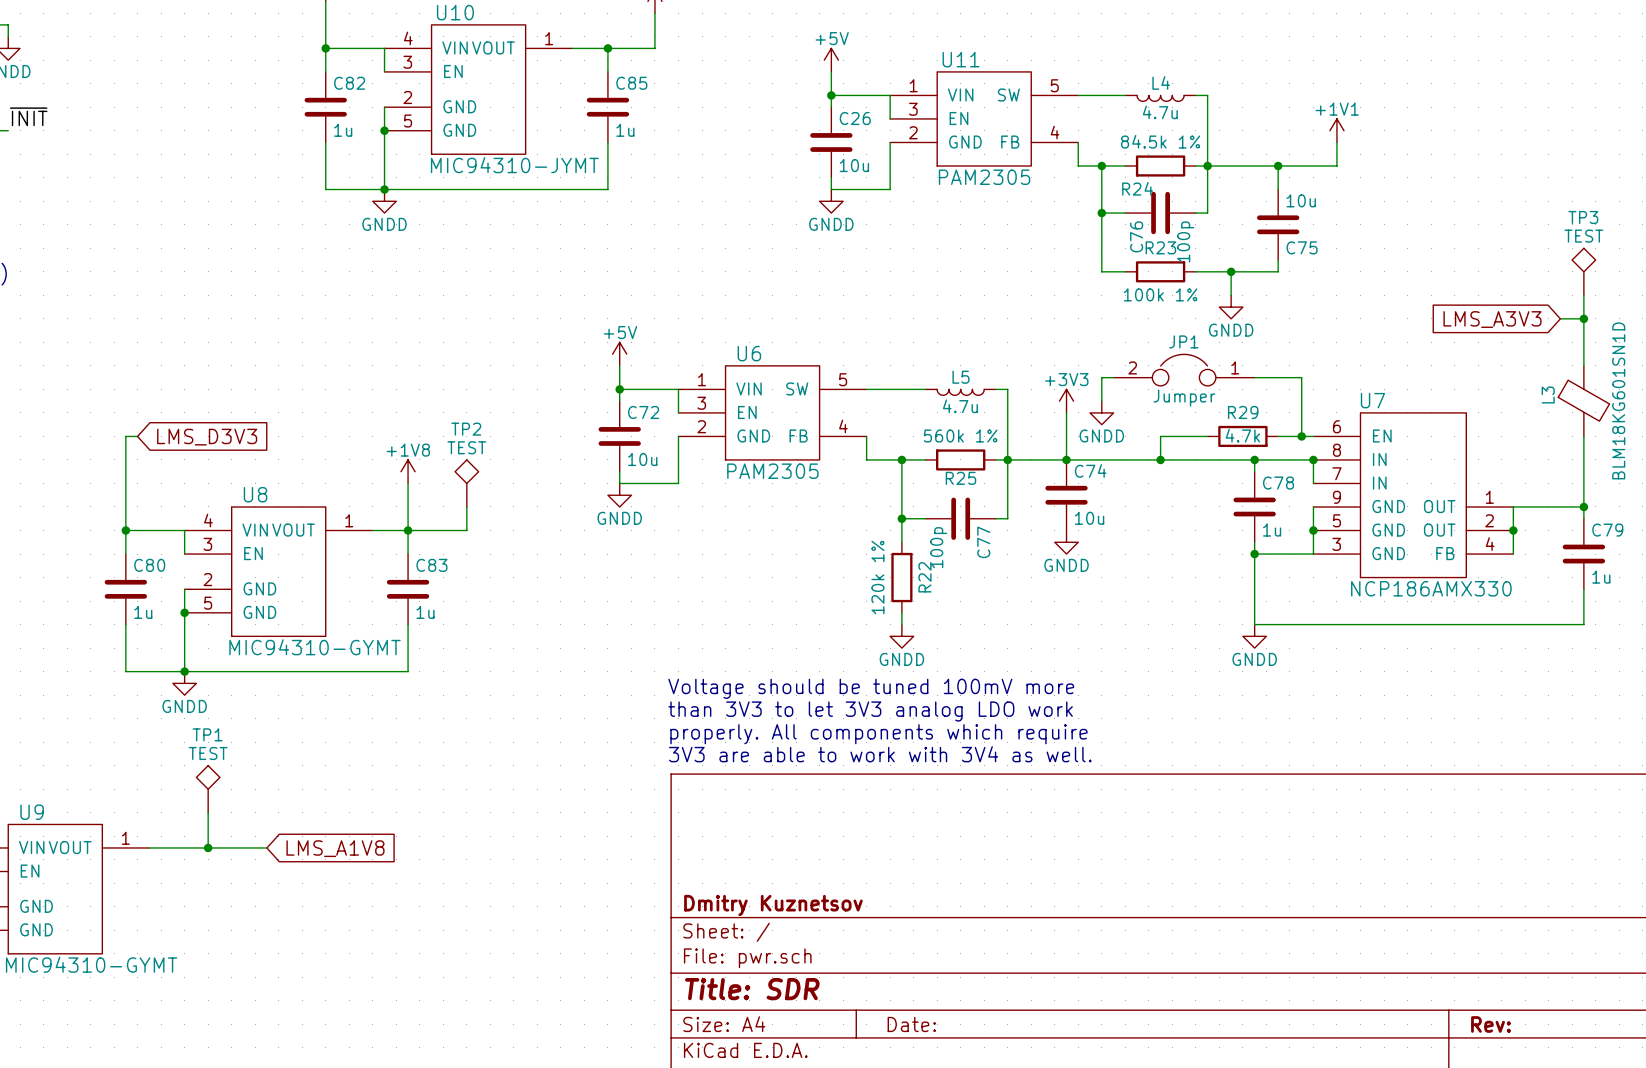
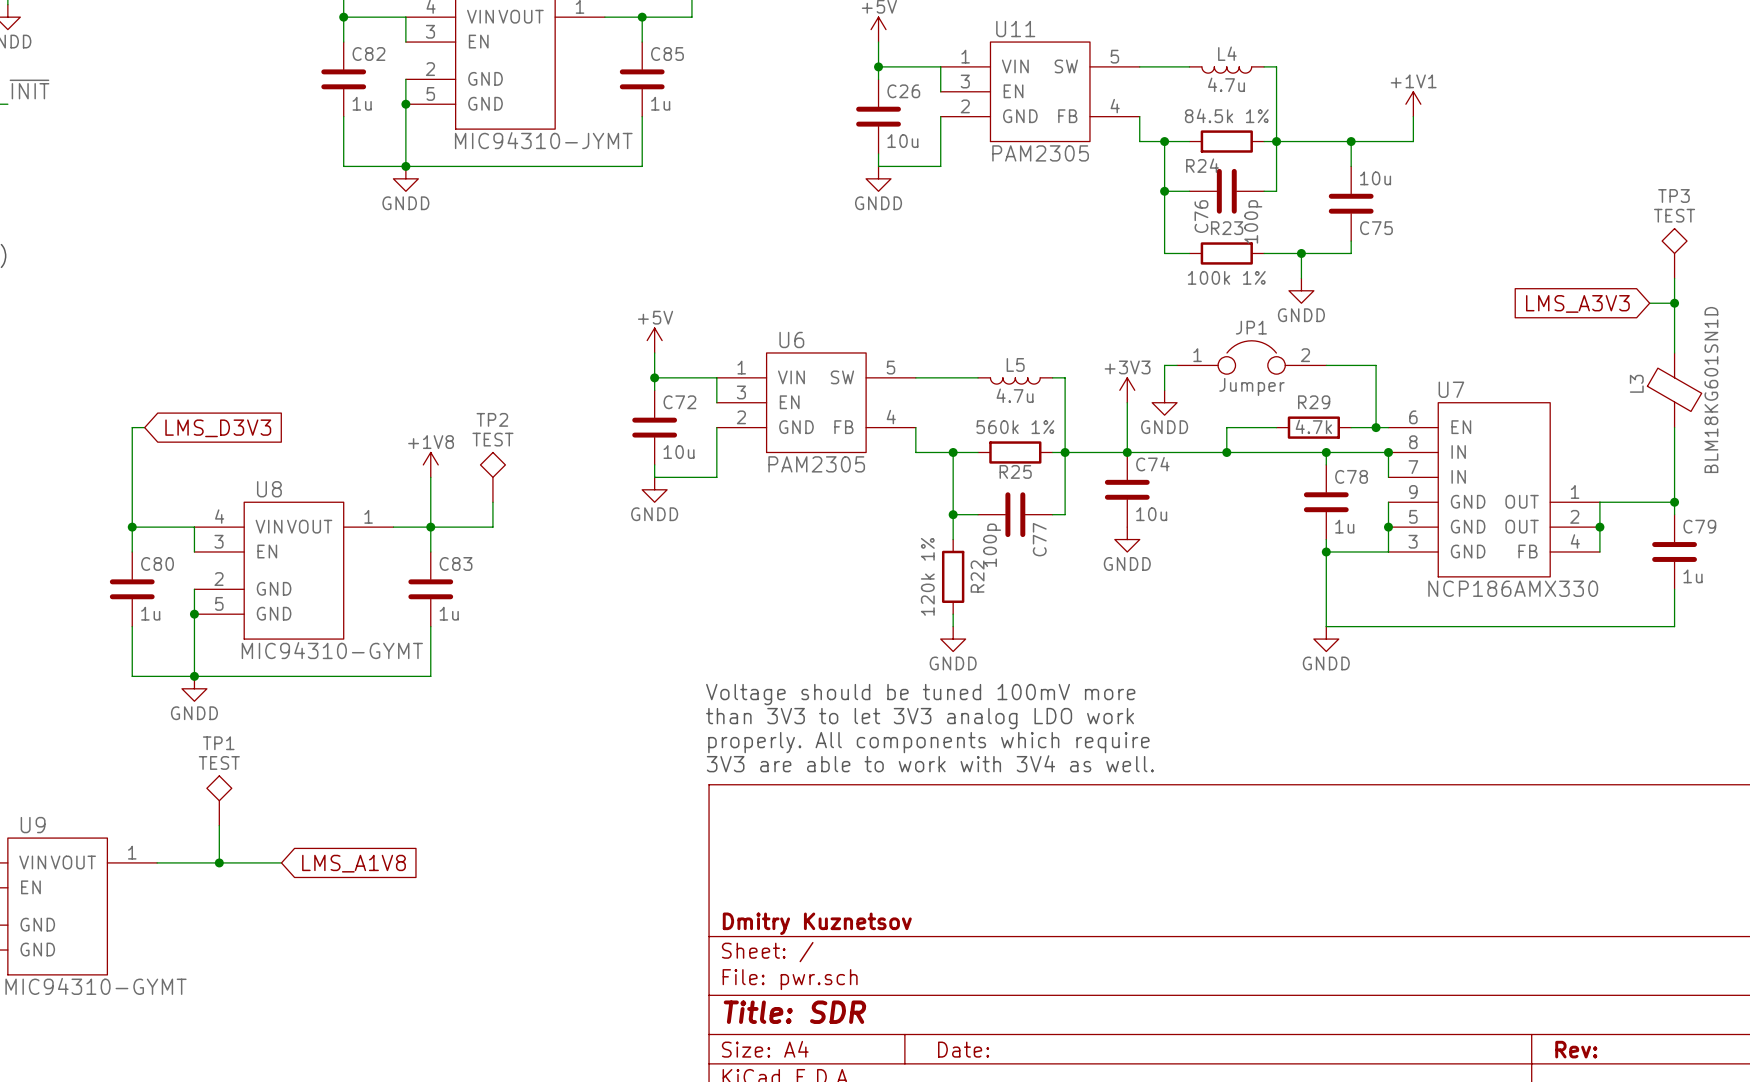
JP1 flip: as is (1184, 370) -> left-right (1251, 357)

